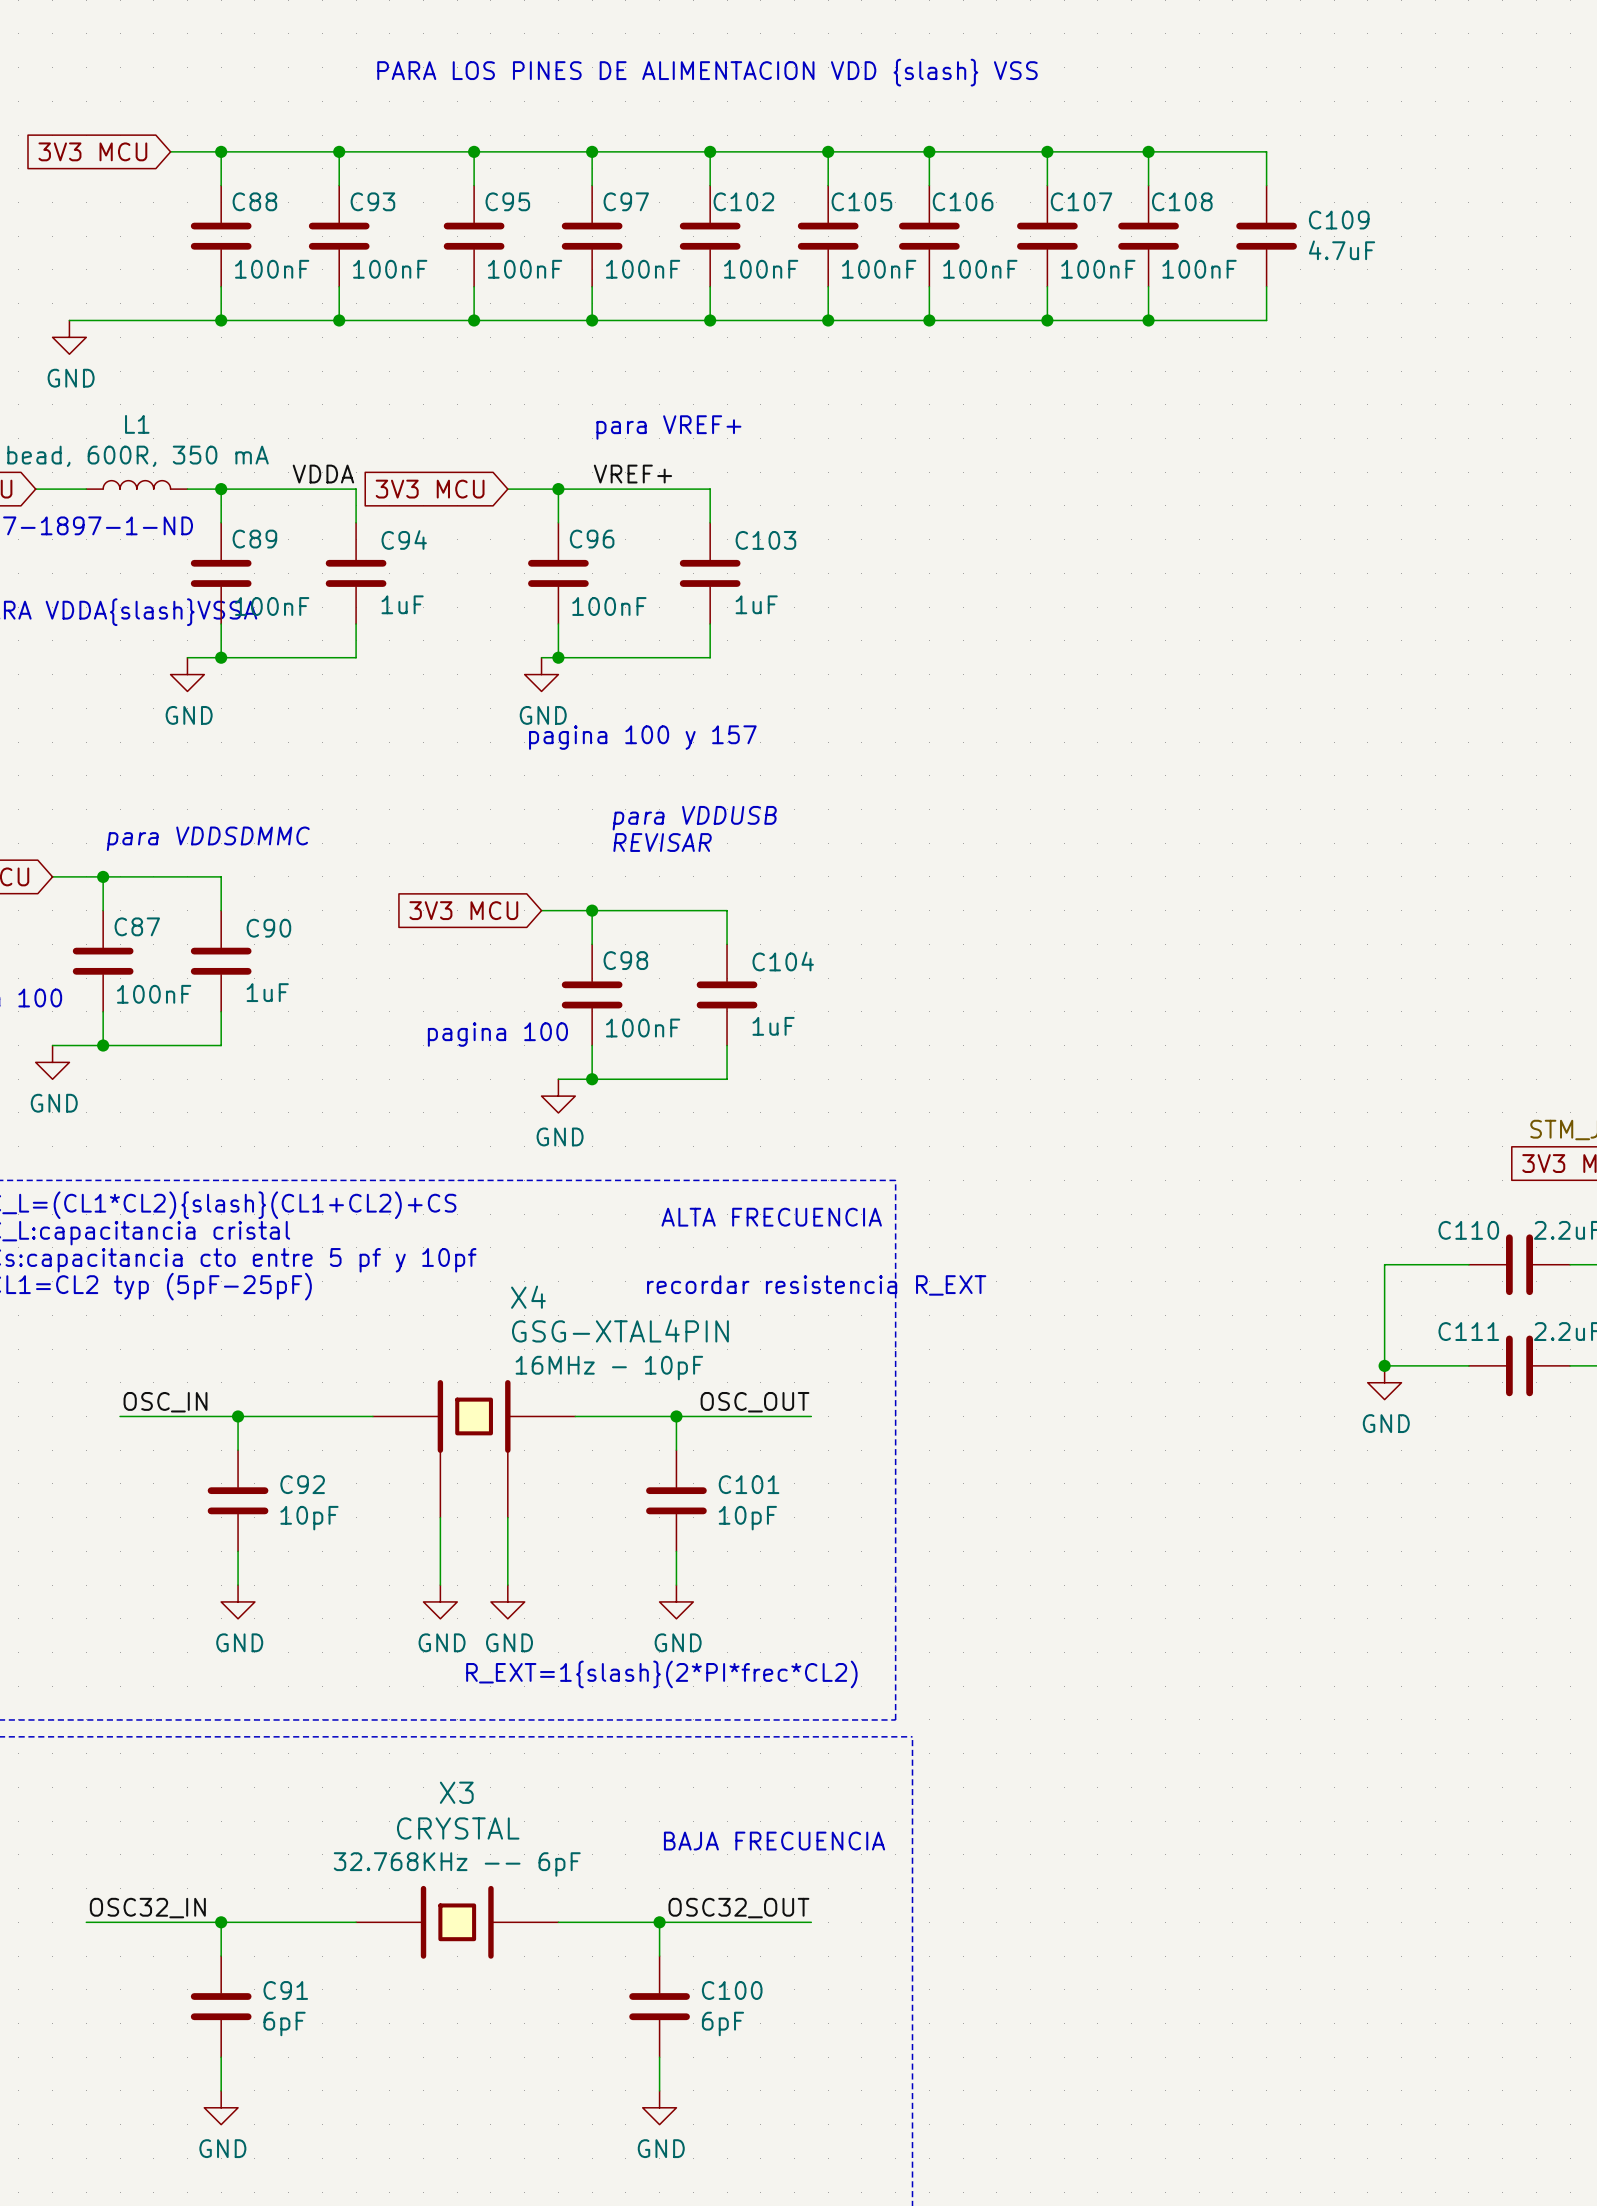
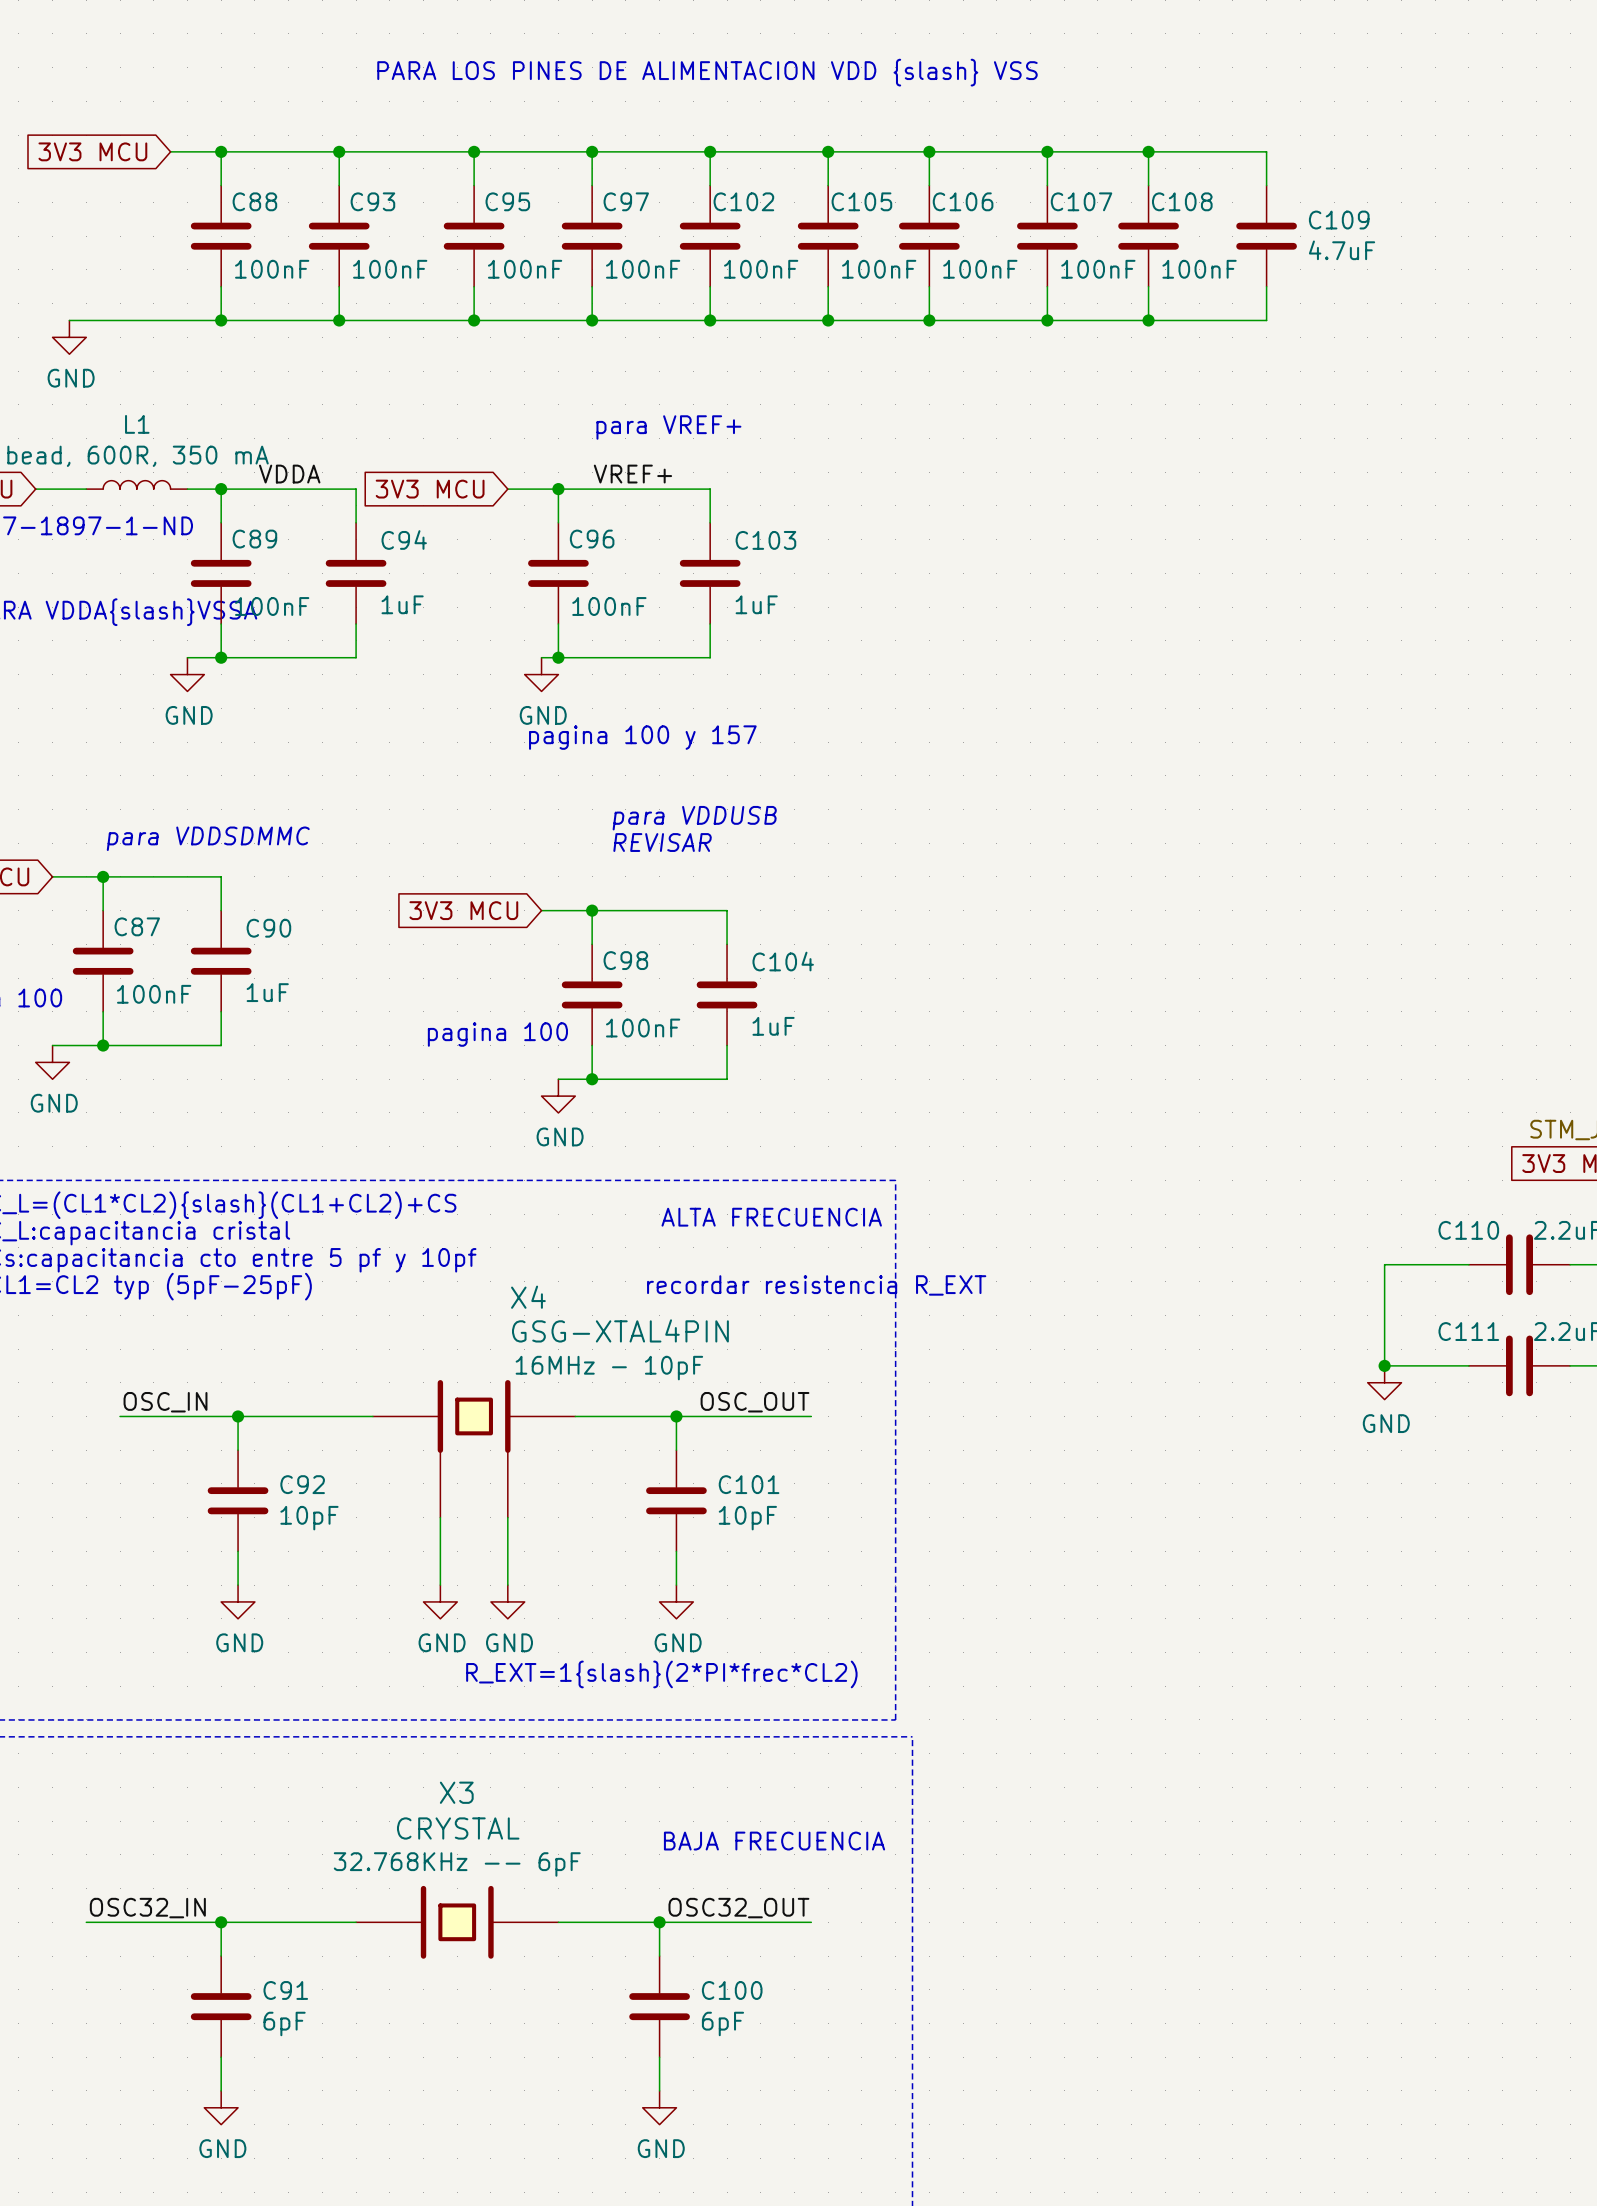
label position: VDDA (323, 474) -> VDDA (289, 474)

